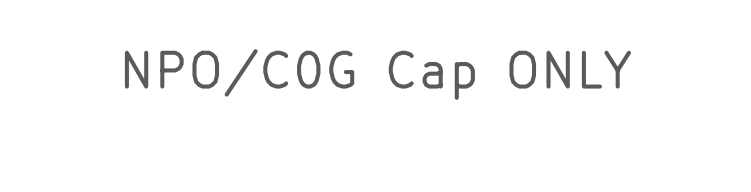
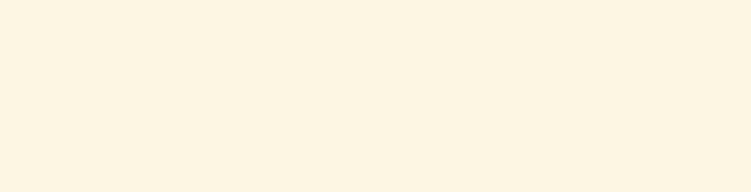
text: NPO/C0G Cap ONLY (377, 74) -> none

